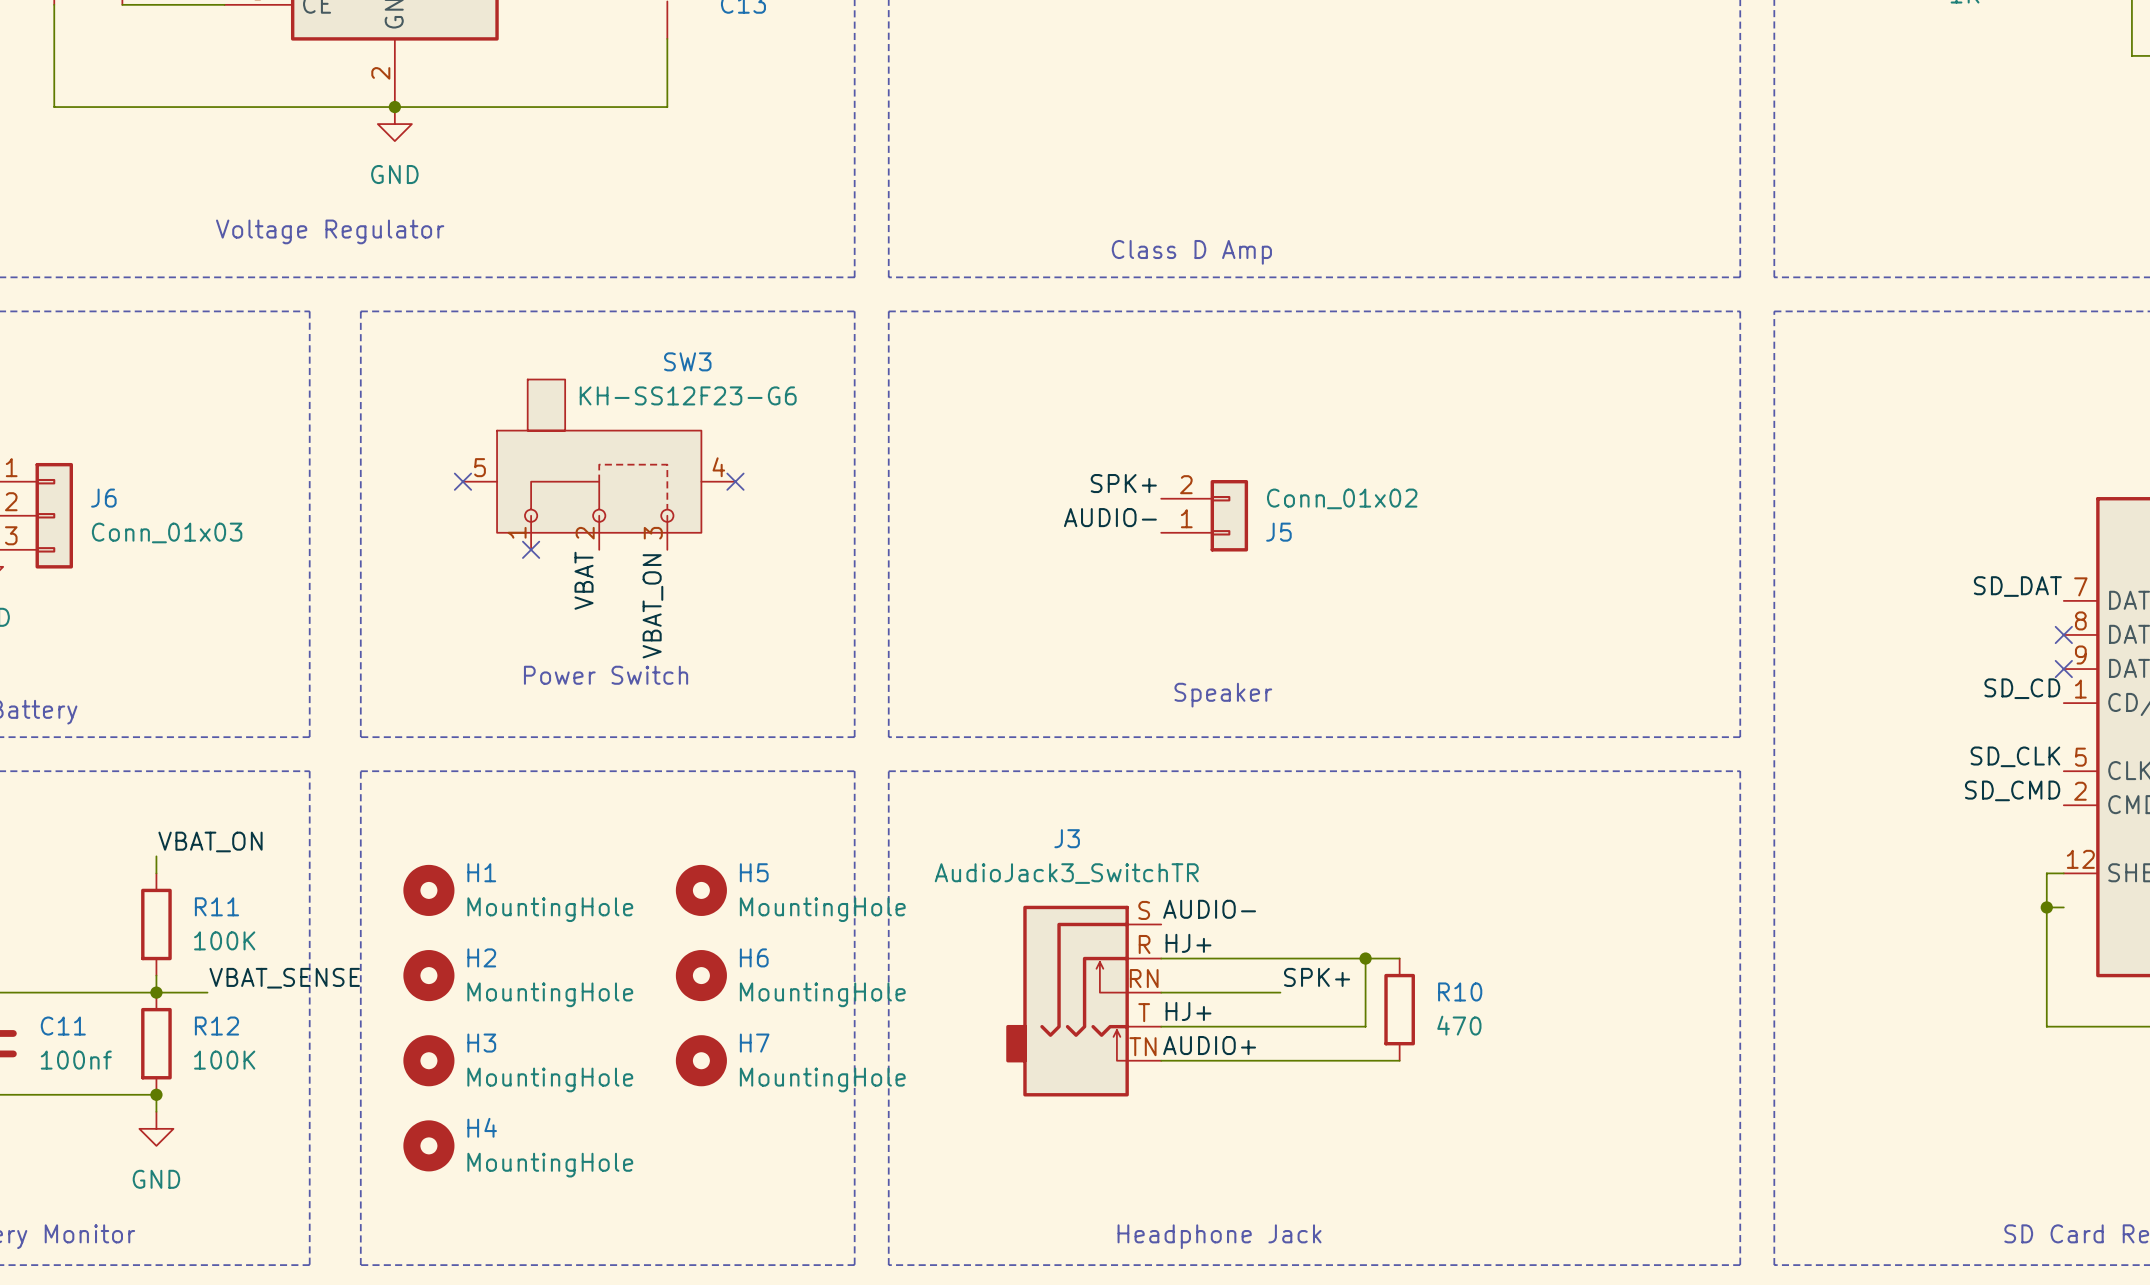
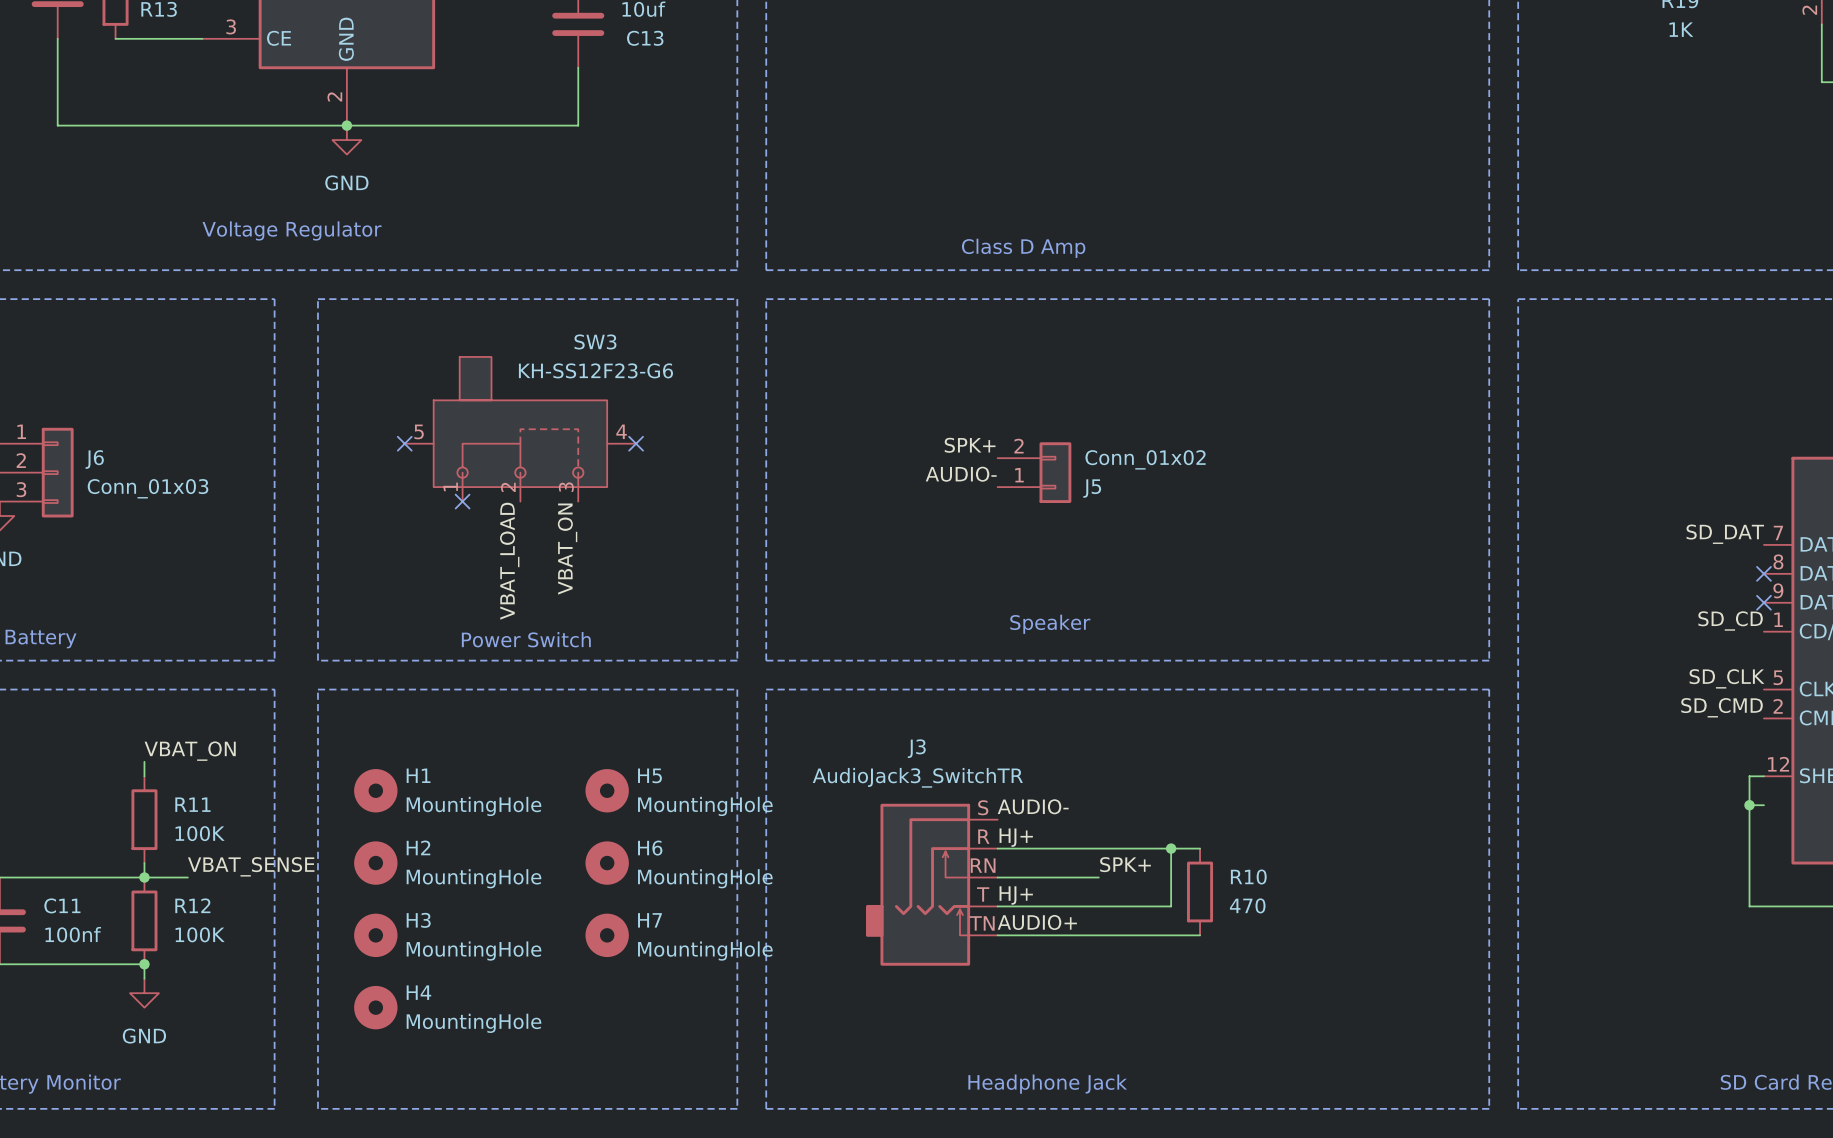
label: VBAT (584, 580) -> VBAT_LOAD (509, 561)
text position: Power Switch (606, 675) -> Power Switch (526, 639)

